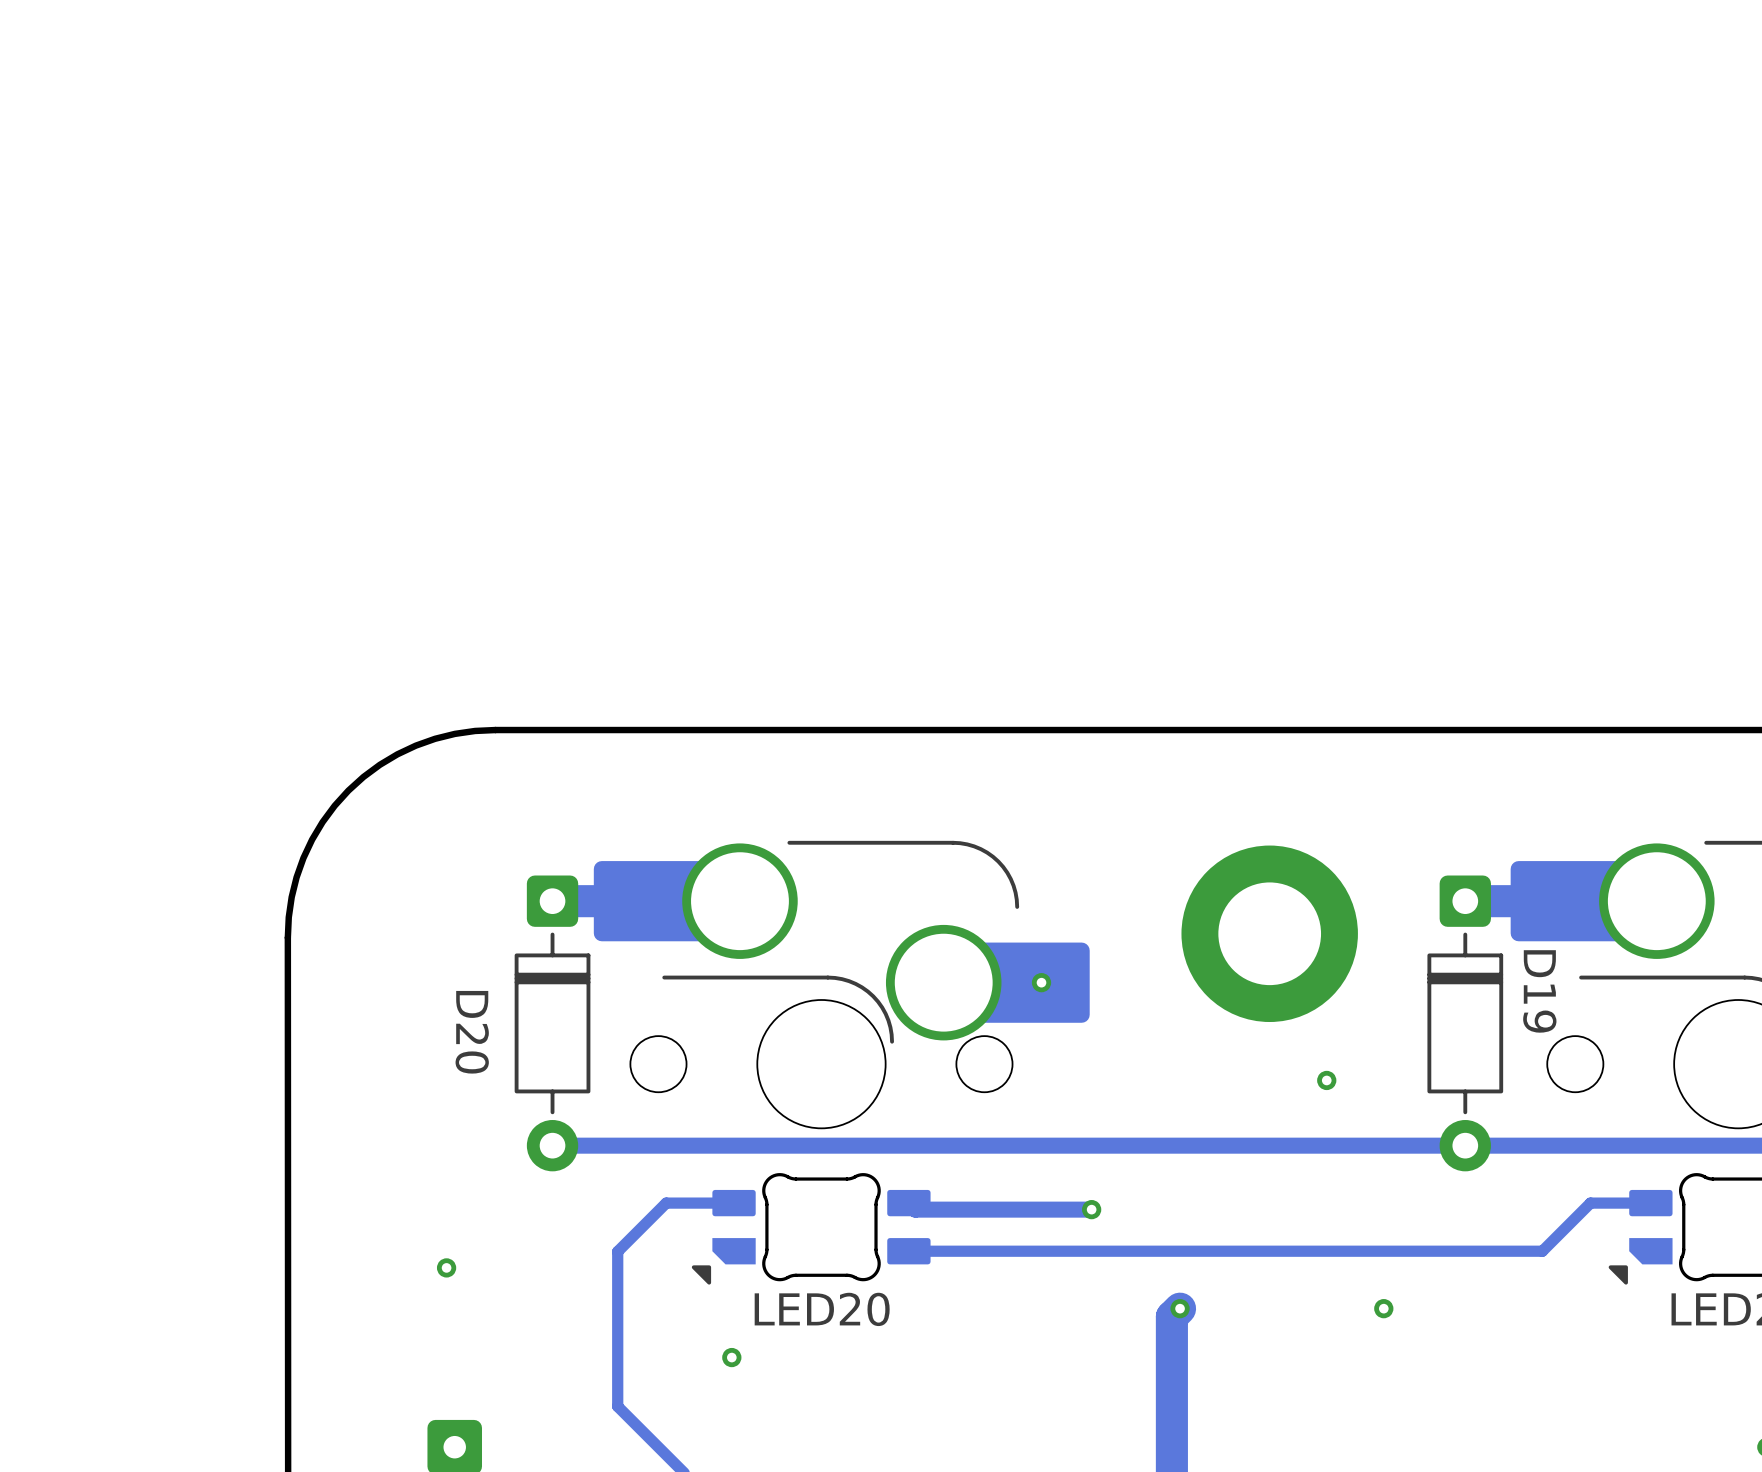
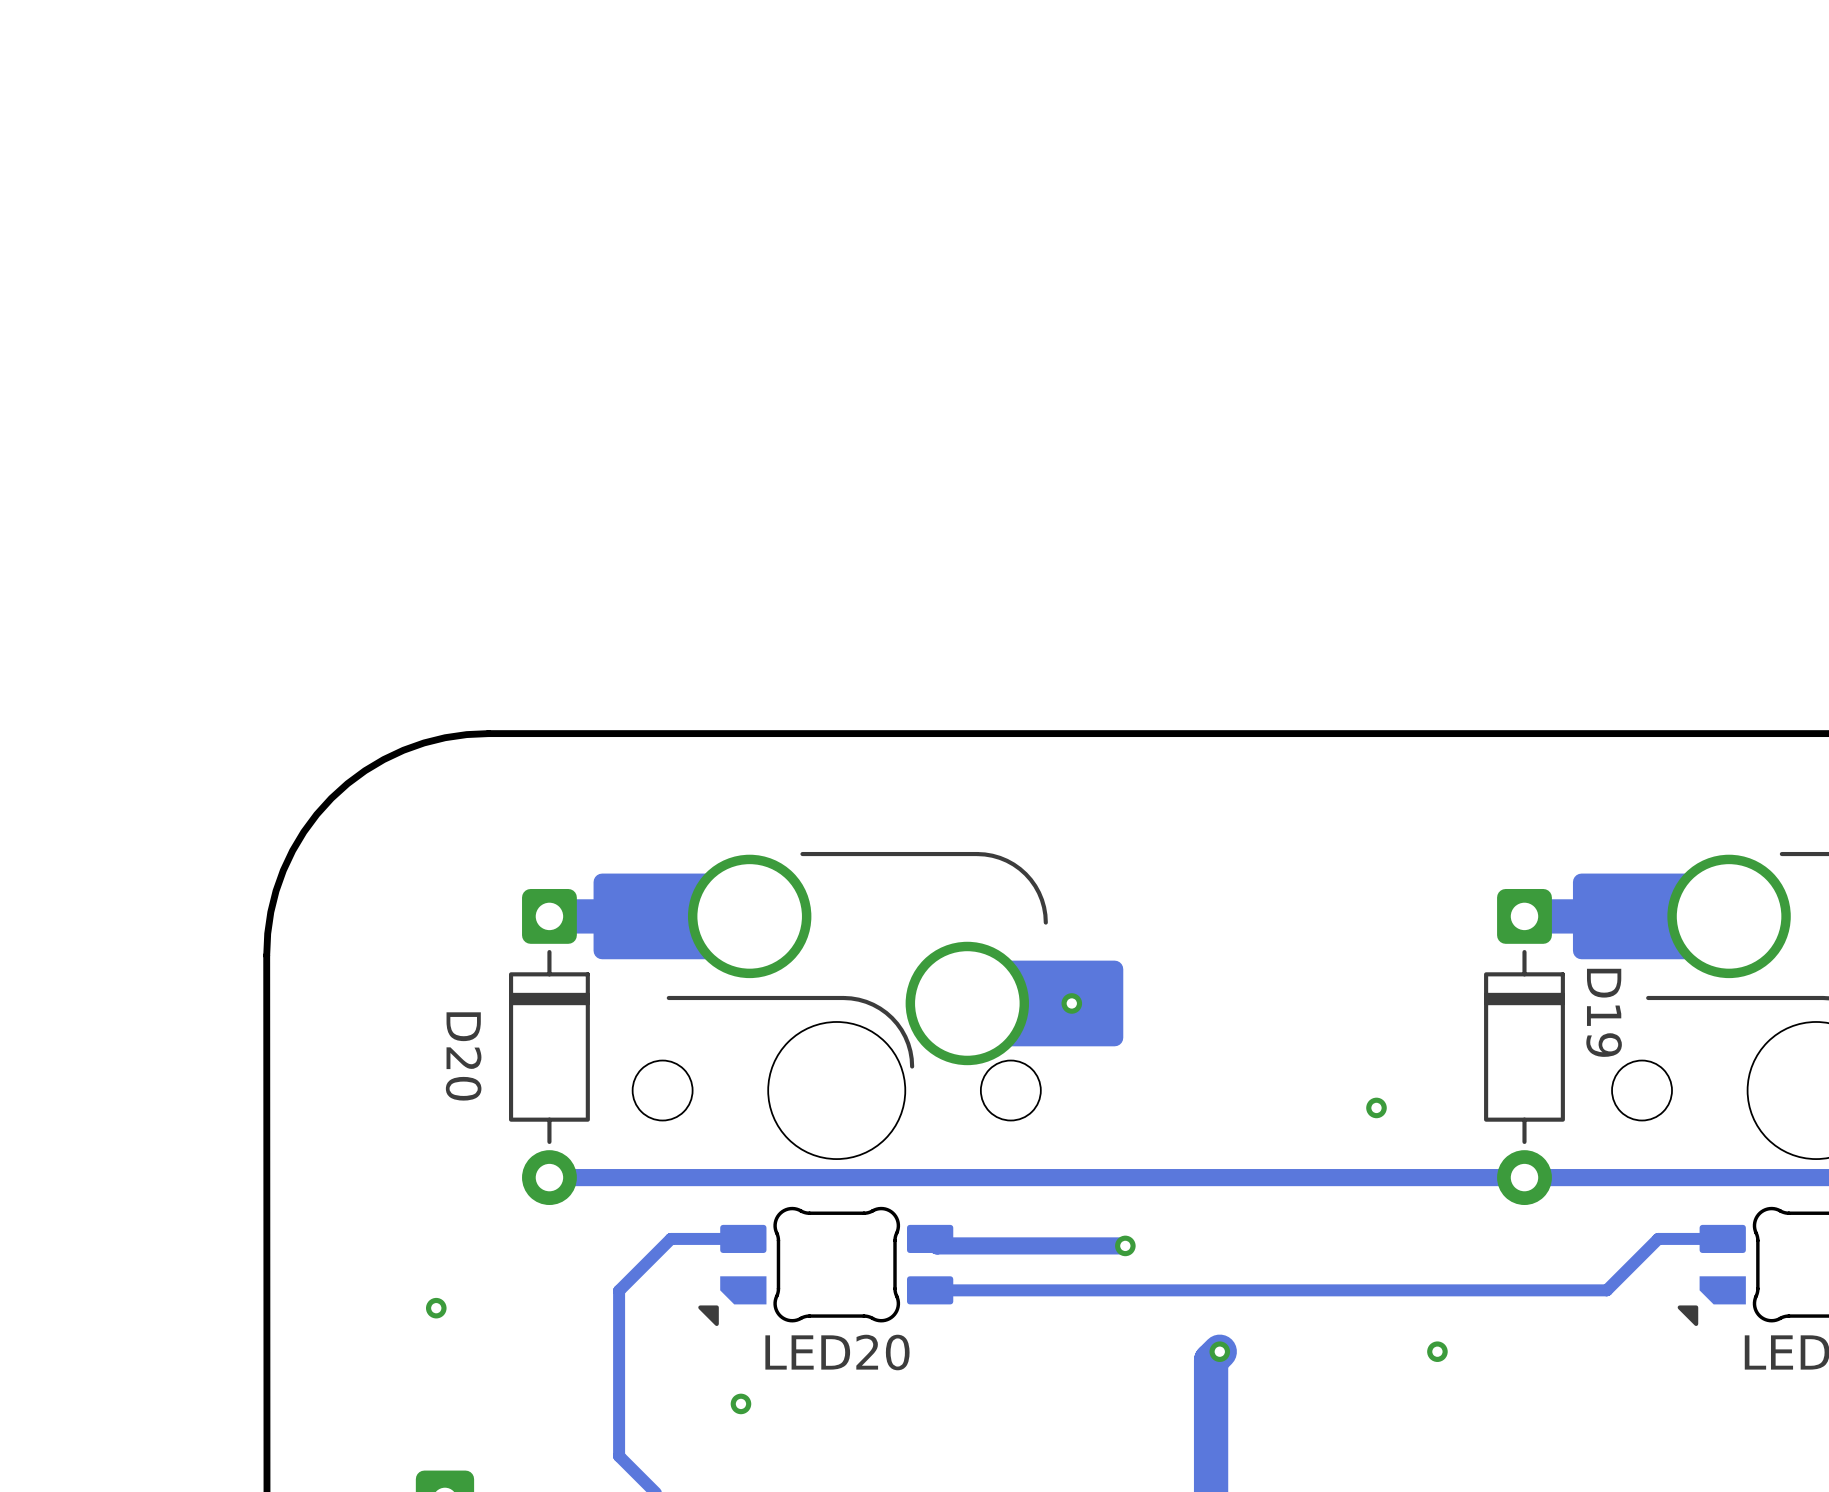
part: (1269, 933) -> none

